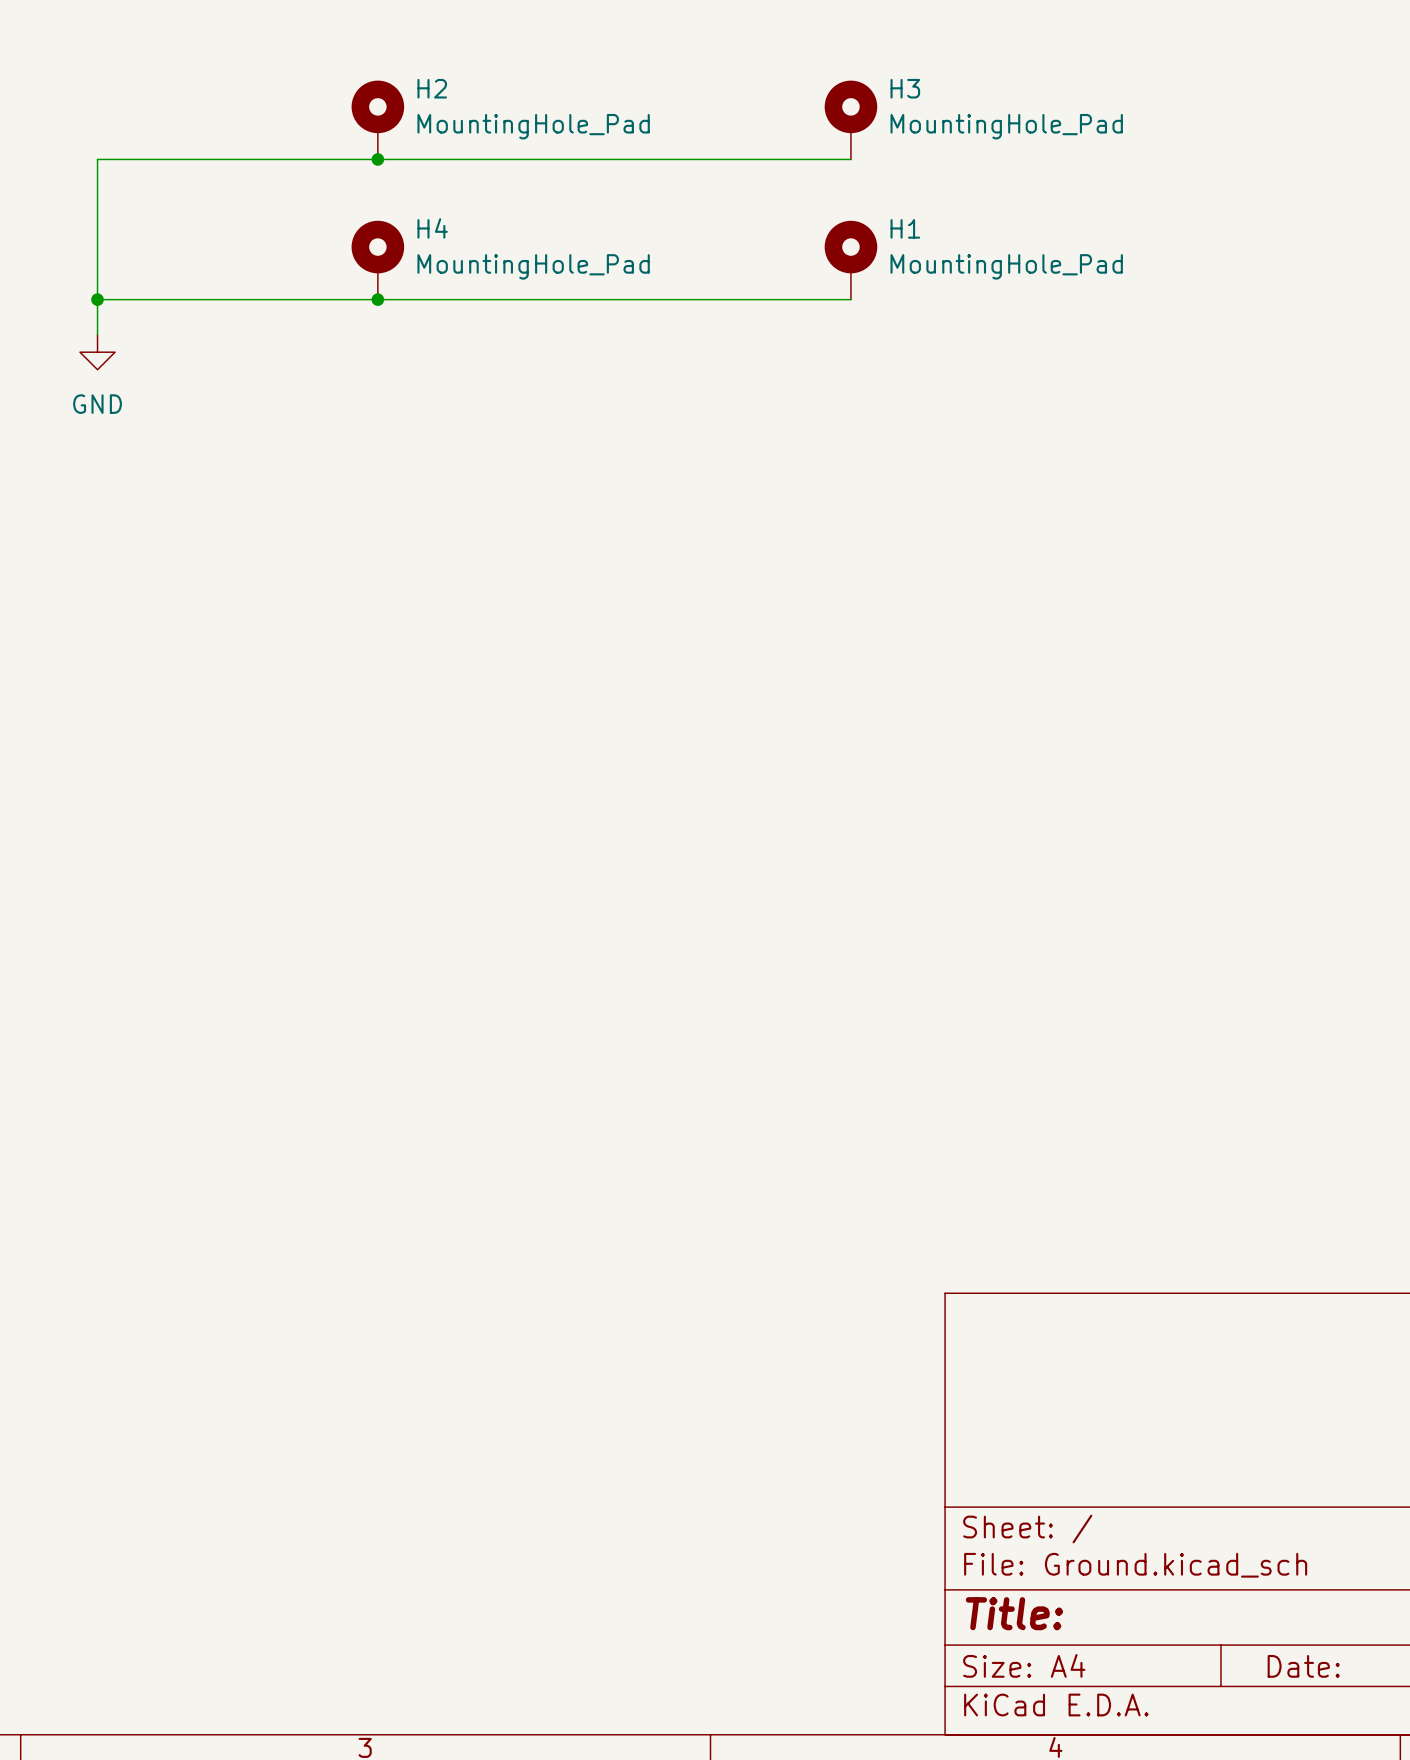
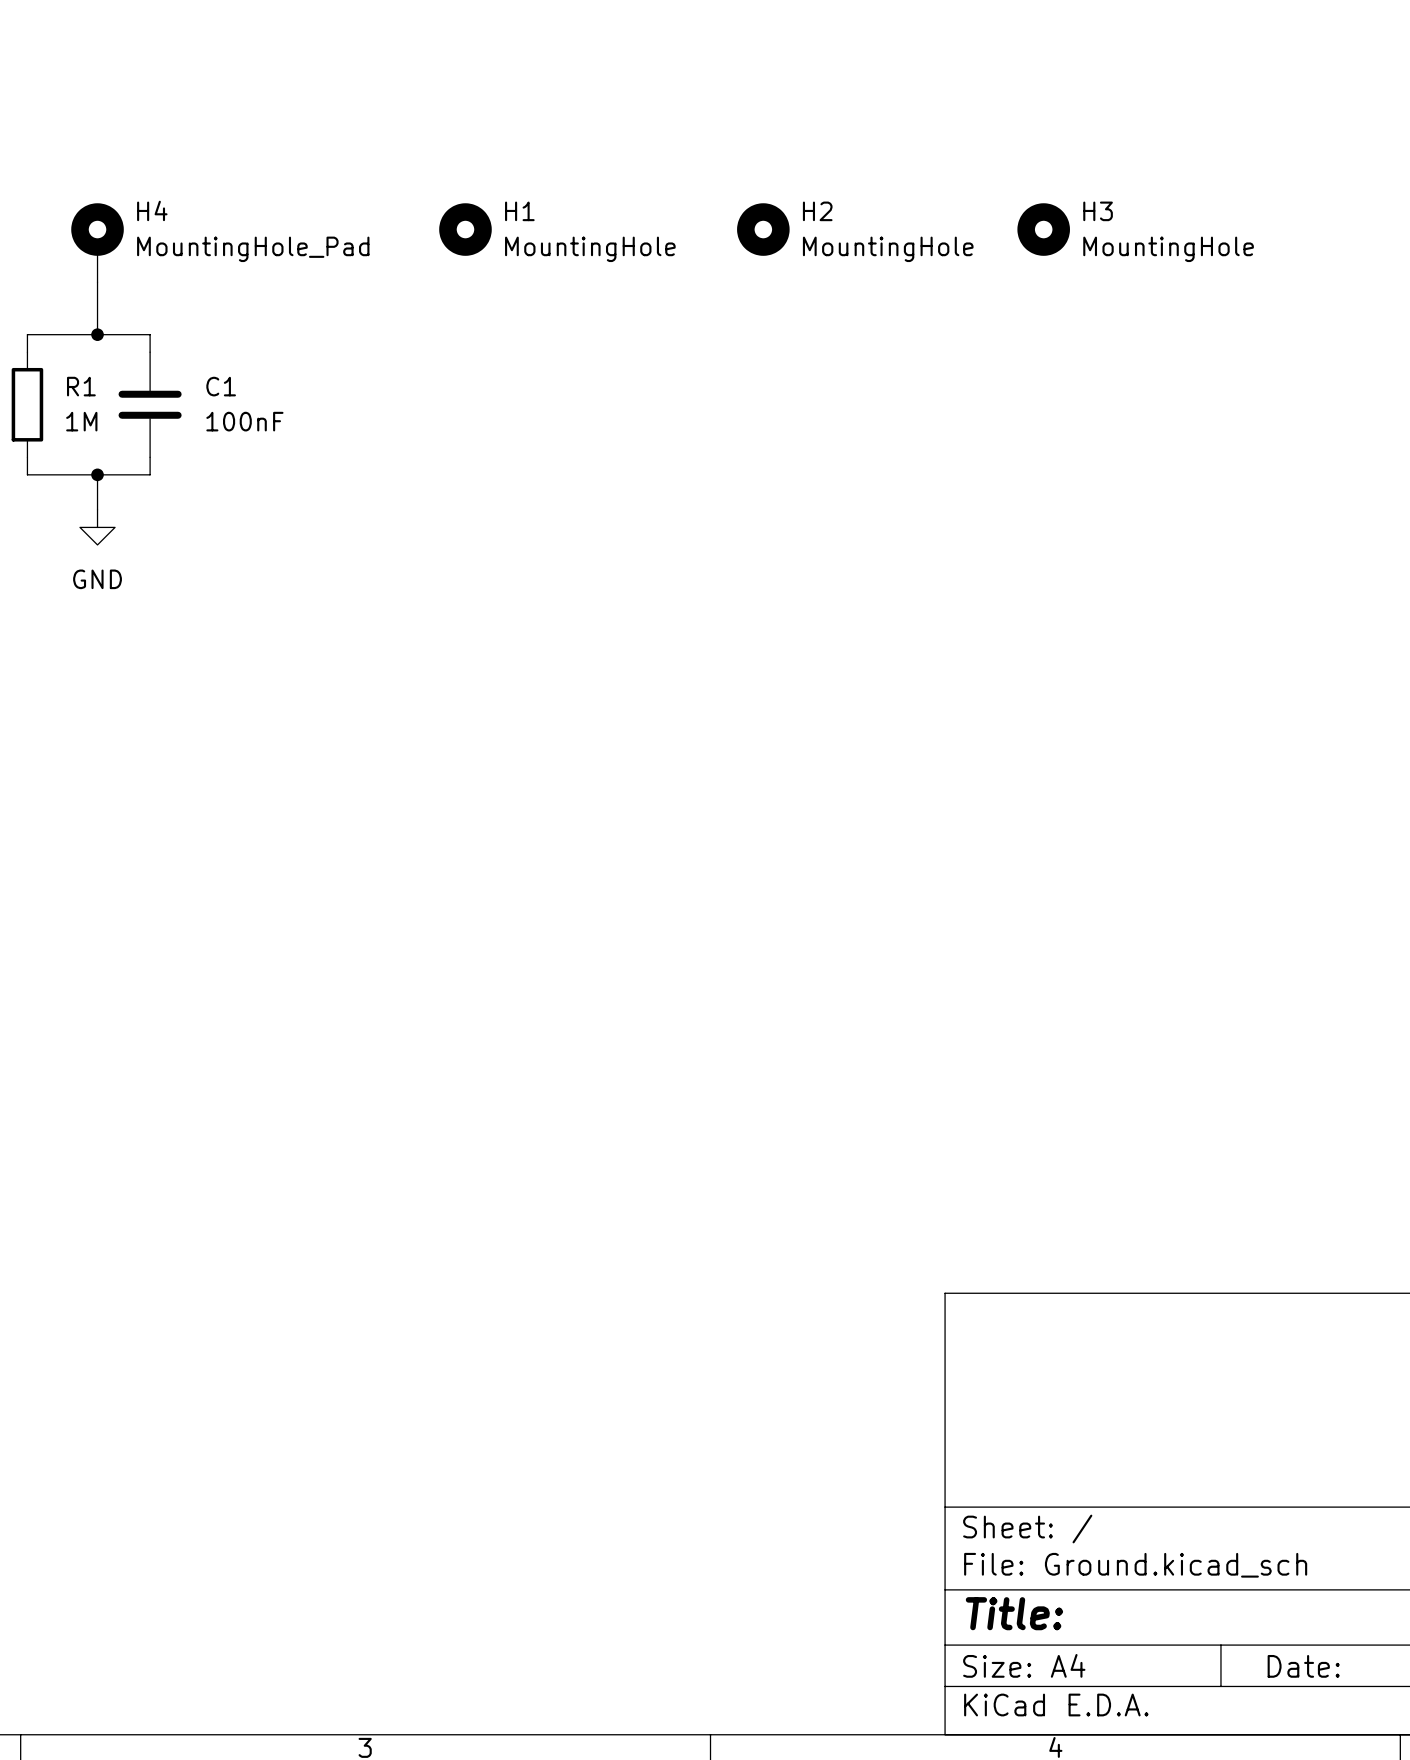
H2 symbol: [351, 80, 405, 160] -> [737, 203, 790, 256]
H3 symbol: [824, 80, 878, 160] -> [1017, 203, 1070, 256]
H2 value: MountingHole_Pad (533, 126) -> MountingHole (888, 249)
H3 value: MountingHole_Pad (1006, 126) -> MountingHole (1168, 249)
junction: (377, 159) -> none
wire: (850, 159) (97, 159) (97, 282) -> none
H1 symbol: [824, 220, 878, 300] -> [439, 203, 492, 256]
H4 position: (377, 260) -> (97, 242)
H1 value: MountingHole_Pad (1006, 266) -> MountingHole (590, 249)
wire: (97, 299) (850, 299) -> none
junction position: (97, 299) -> (97, 334)
junction: (377, 299) -> none
wire: none -> (27, 352) (27, 334) (150, 334) (150, 352)
power symbol position: GND (97, 352) -> GND (97, 527)
R1: none -> 1M (27, 404)
C1: none -> 100nF (150, 404)
wire: none -> (27, 457) (27, 474) (150, 474) (150, 457)
wire: none -> (97, 474) (97, 509)
junction: none -> (97, 474)

